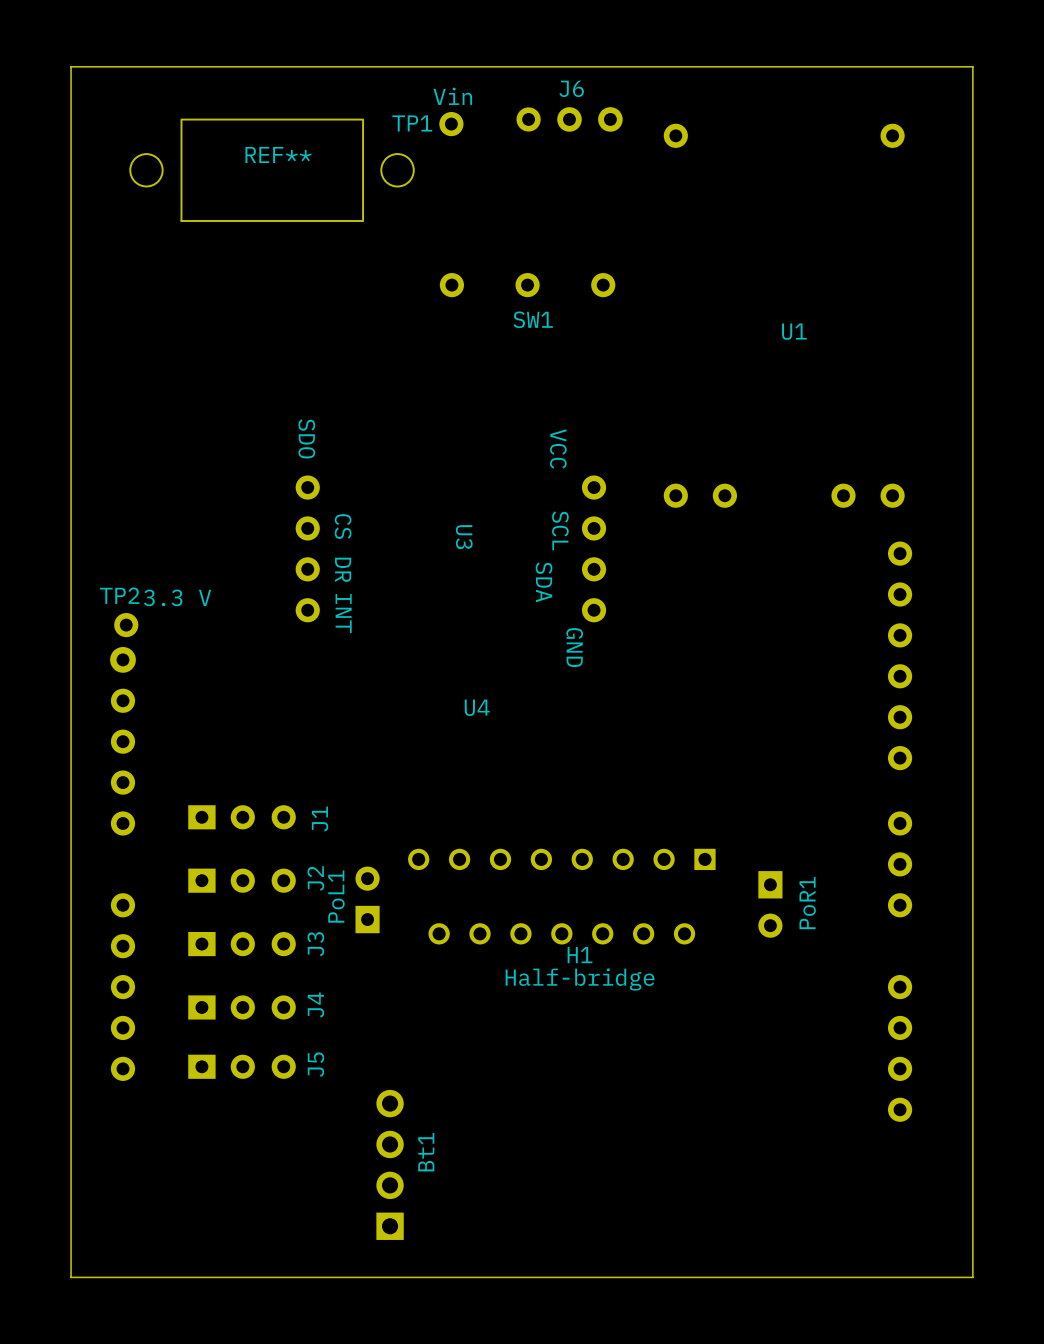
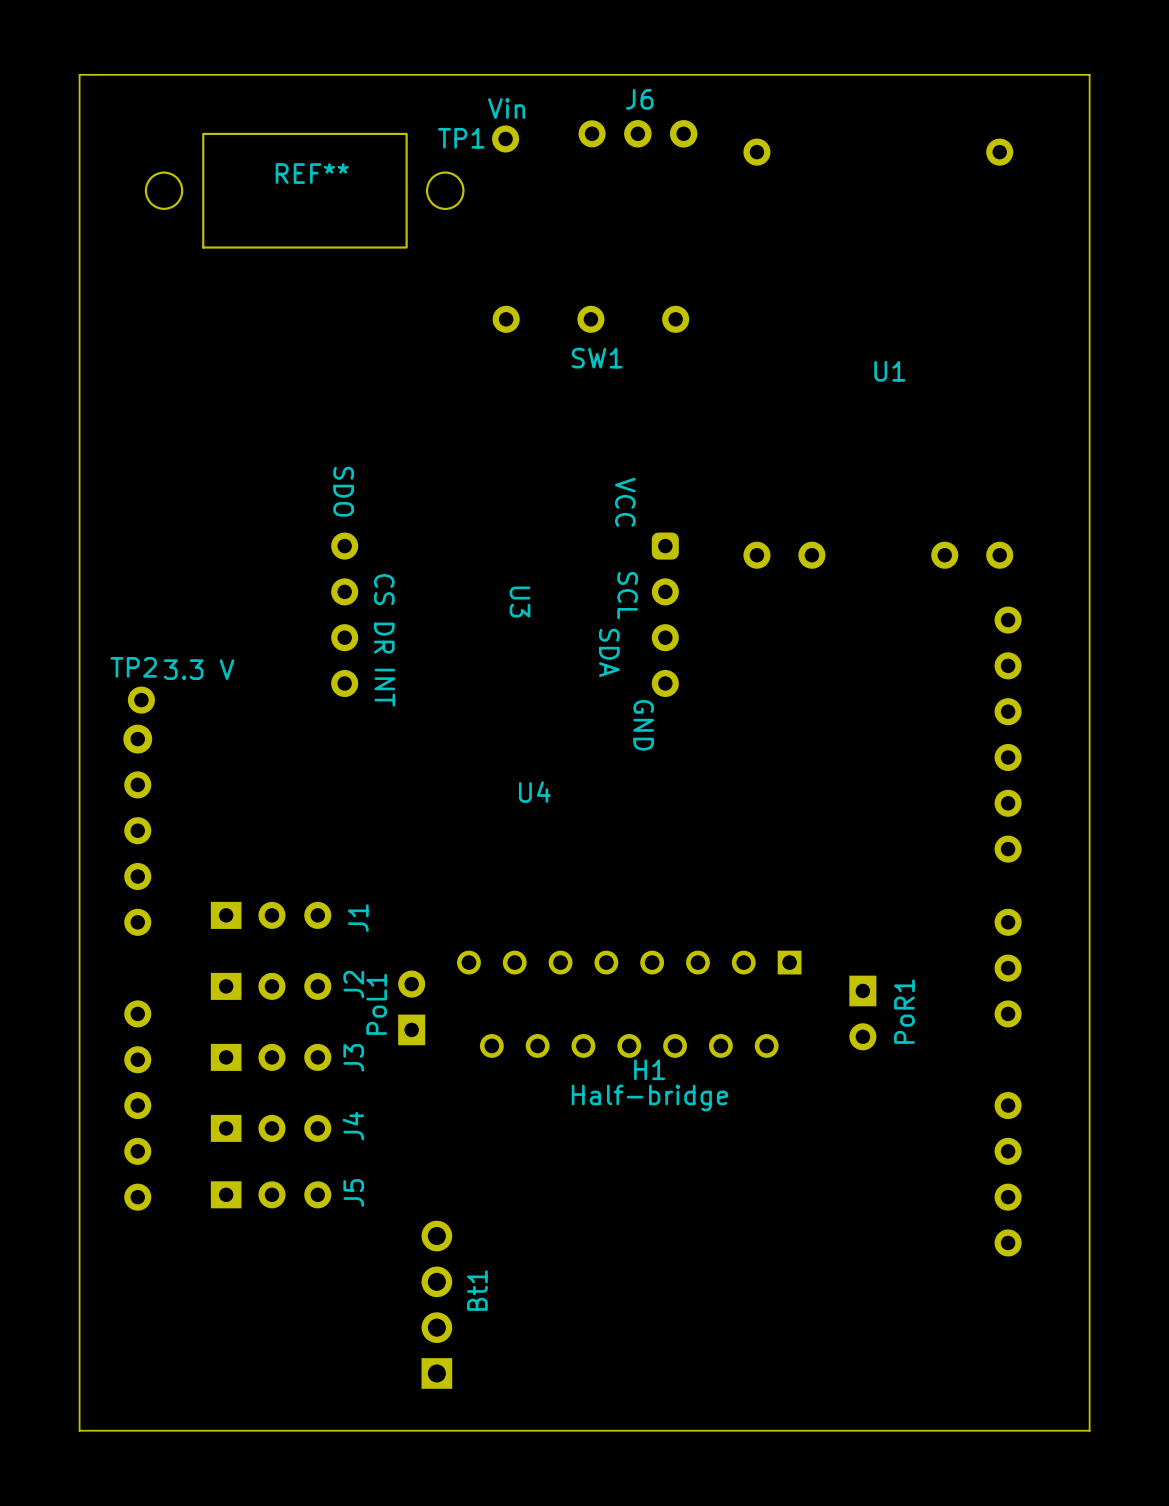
U3 footprint: [295, 475, 607, 623] -> [331, 532, 679, 698]

